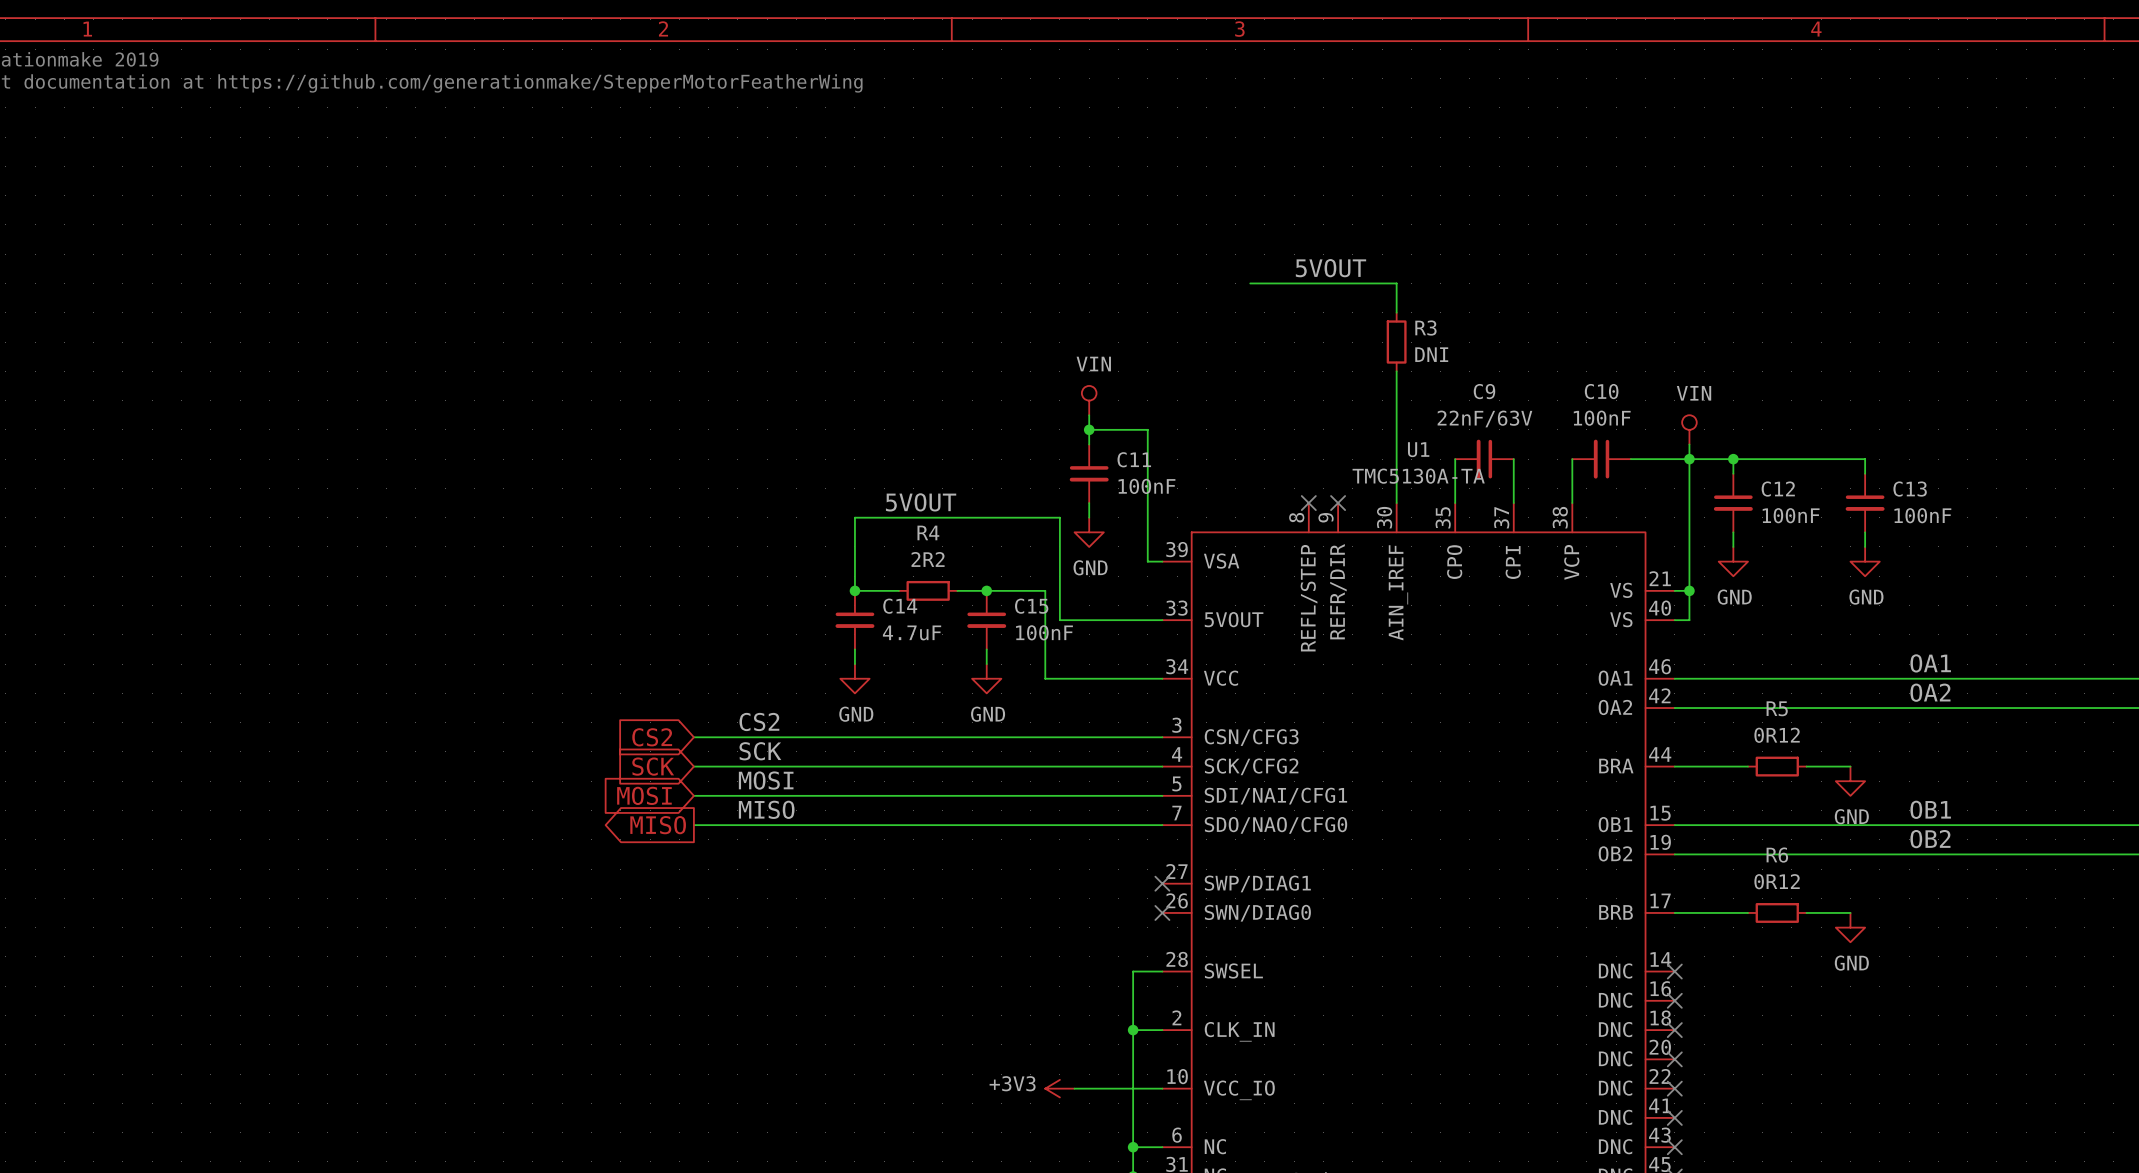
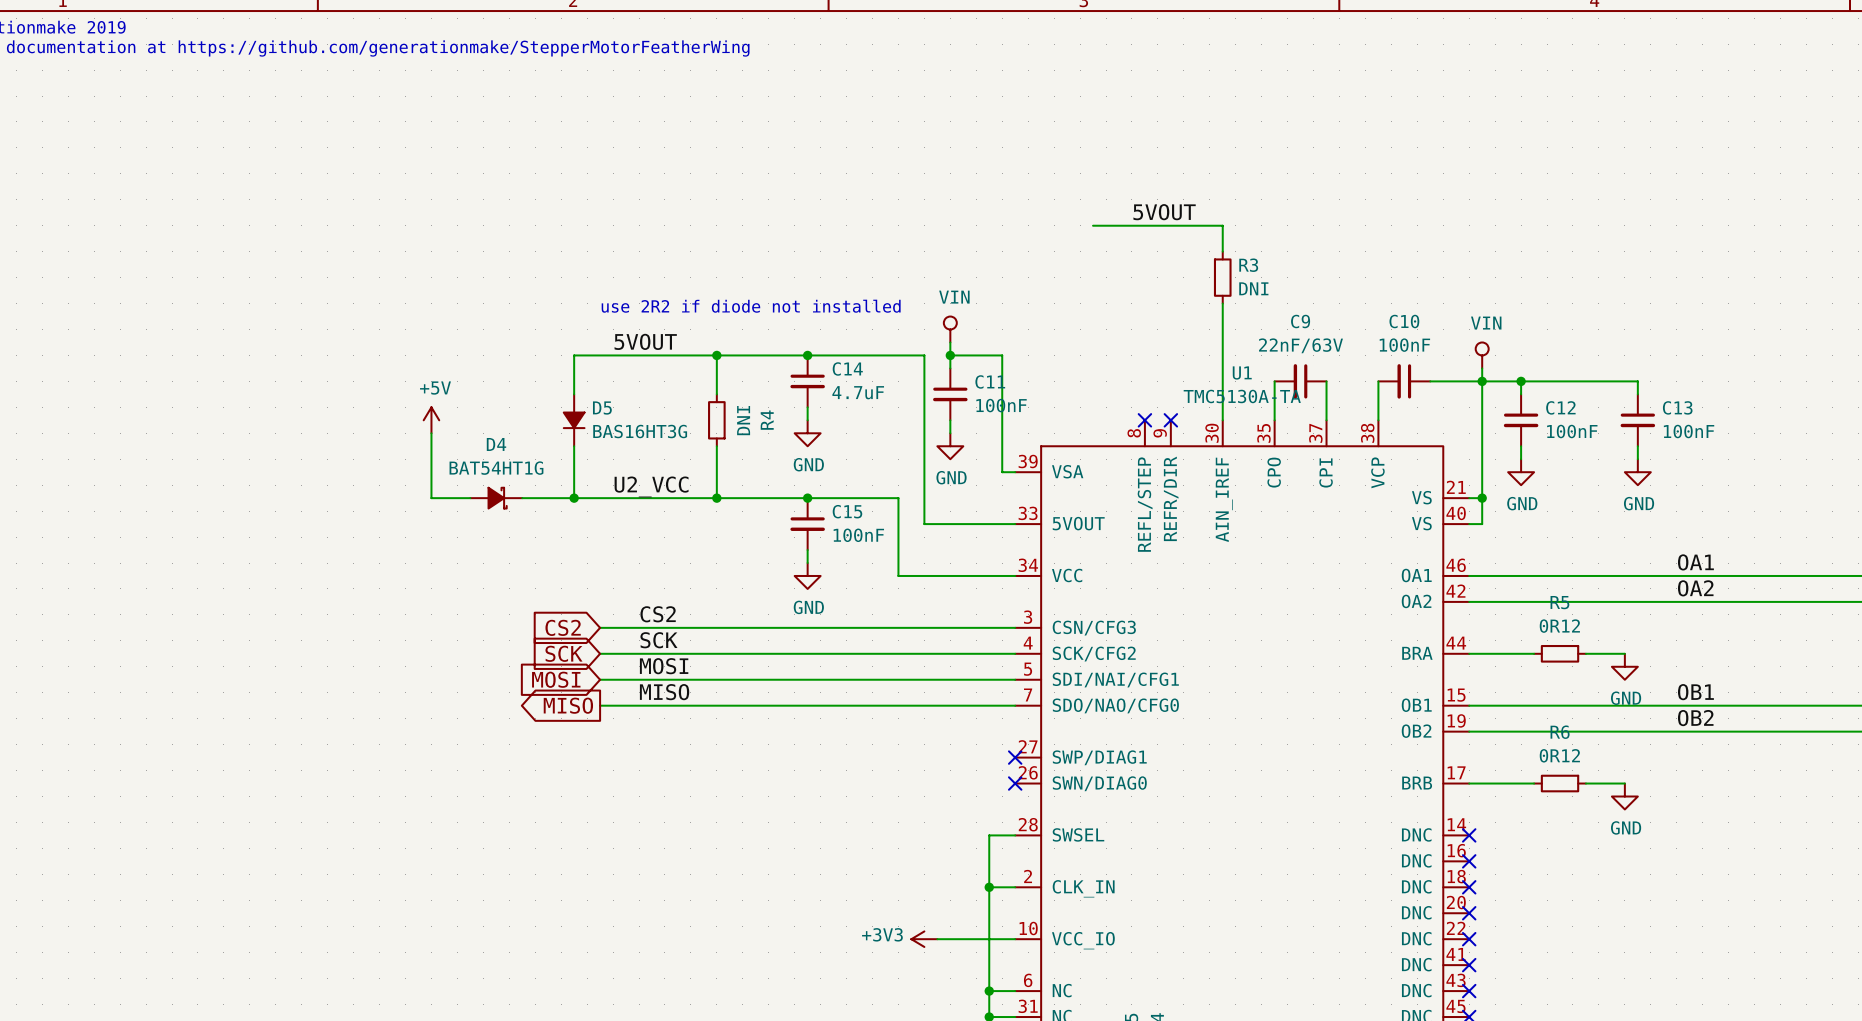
text: none -> use 2R2 if diode not installed (751, 306)
wire: none -> (716, 355) (716, 394)
junction: none -> (716, 355)
junction: none -> (807, 355)
label position: 5VOUT (921, 502) -> 5VOUT (645, 341)
power symbol: none -> +5V (431, 420)
D5: none -> BAS16HT3G (574, 420)
wire: none -> (431, 433) (431, 498) (470, 498)
power symbol: none -> GND (807, 433)
wire: (1059, 517) (854, 517) (854, 590) -> (924, 433) (924, 355) (574, 355) (574, 394)
wire: none -> (574, 446) (574, 498)
wire: none -> (716, 446) (716, 498)
R4 value: 2R2 (928, 559) -> DNI (743, 420)
label: none -> U2_VCC (651, 486)
D4: none -> BAT54HT1G (496, 498)
wire: none -> (522, 498) (742, 498)
junction: none -> (574, 498)
junction position: (854, 590) -> (716, 498)
wire: none -> (781, 498) (833, 498)
R4 rotation: 0° (928, 590) -> 90° clockwise (716, 420)
R4 position: (928, 590) -> (716, 420)
junction: none -> (807, 498)
junction: (986, 590) -> none
wire: (1030, 590) (1045, 590) (1045, 678) -> (898, 498) (898, 575) (911, 575)
C14 position: (854, 620) -> (807, 381)
C15 position: (986, 620) -> (807, 524)
wire: (854, 649) (854, 664) -> (807, 407) (807, 420)
wire: (986, 649) (986, 664) -> (807, 550) (807, 563)
power symbol: GND (854, 678) -> none
power symbol: none -> GND (807, 575)
power symbol: GND (986, 678) -> none

